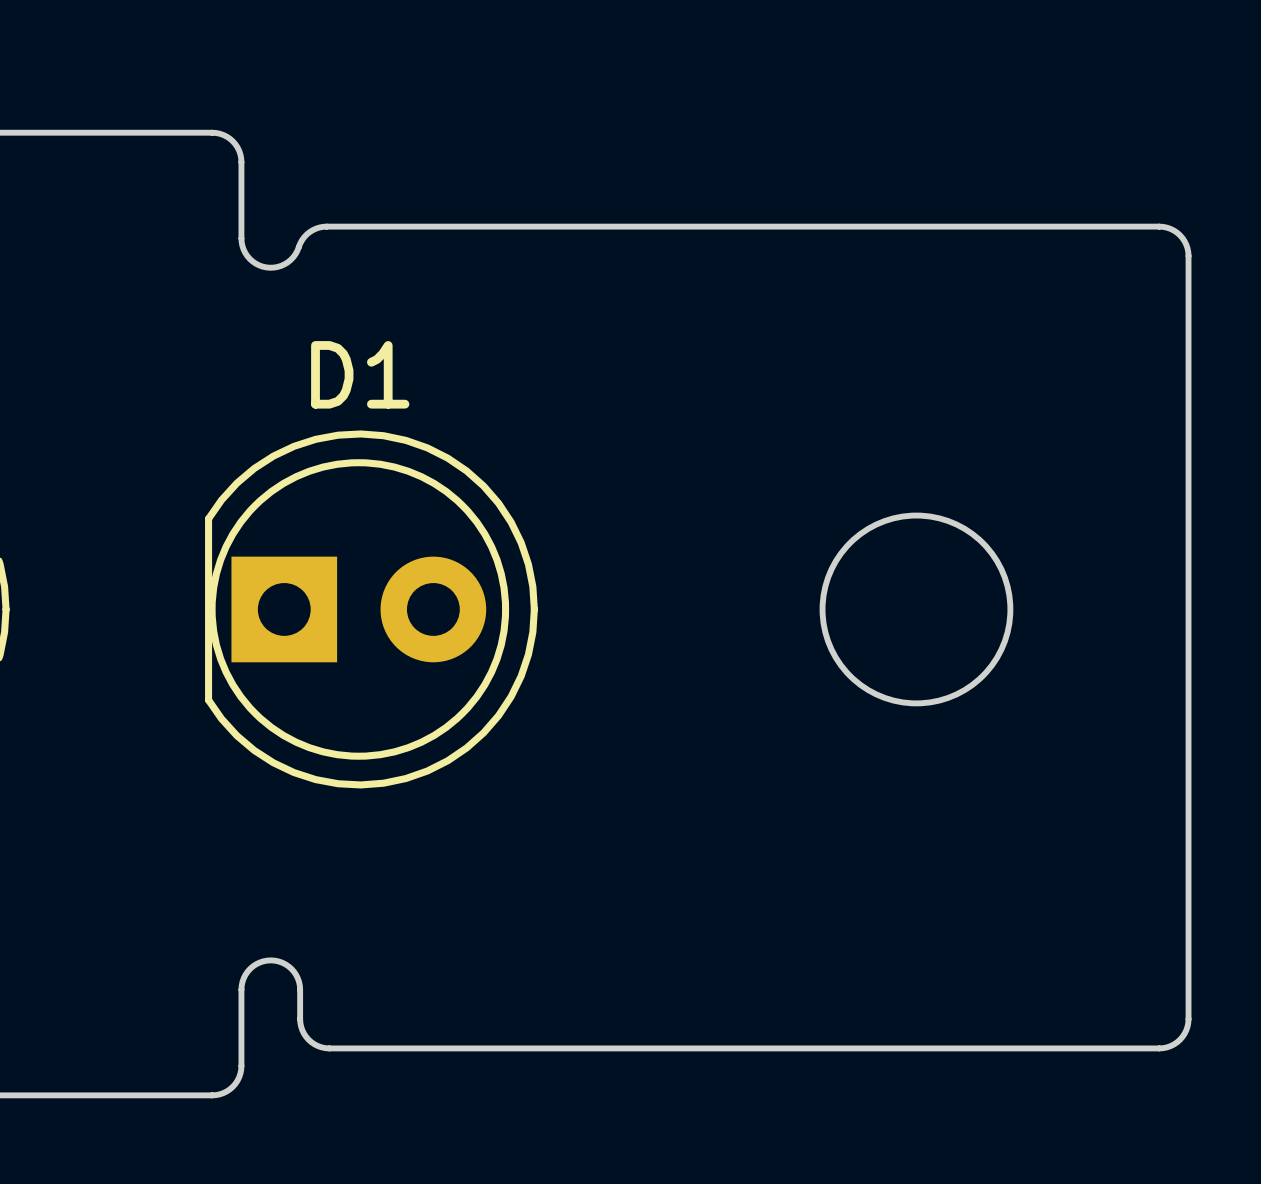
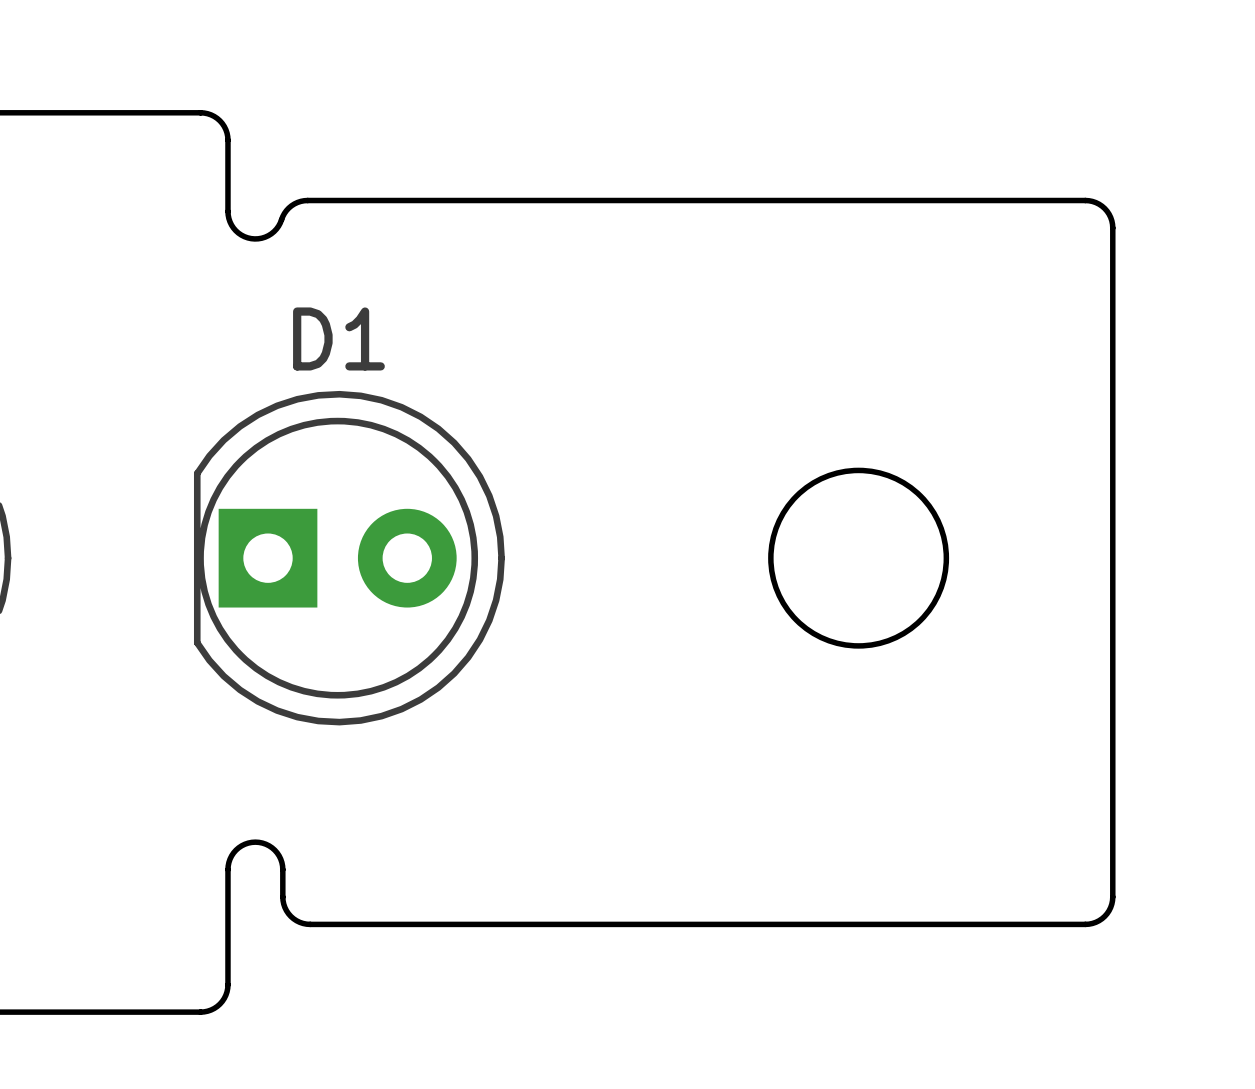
board edge: (1188, 972) (1188, 1019) (1186, 1030) (1177, 1042) (1159, 1048) (329, 1048) (314, 1044) (304, 1033) (300, 1022) (299, 982) (294, 971) (285, 964) (270, 960) (256, 964) (245, 975) (241, 989) -> (1112, 896) (1110, 907) (1104, 916) (1095, 922) (1085, 924) (310, 924) (296, 920) (286, 910) (283, 900) (280, 859) (272, 847) (255, 842) (238, 847) (230, 859) (227, 869) (227, 913)

